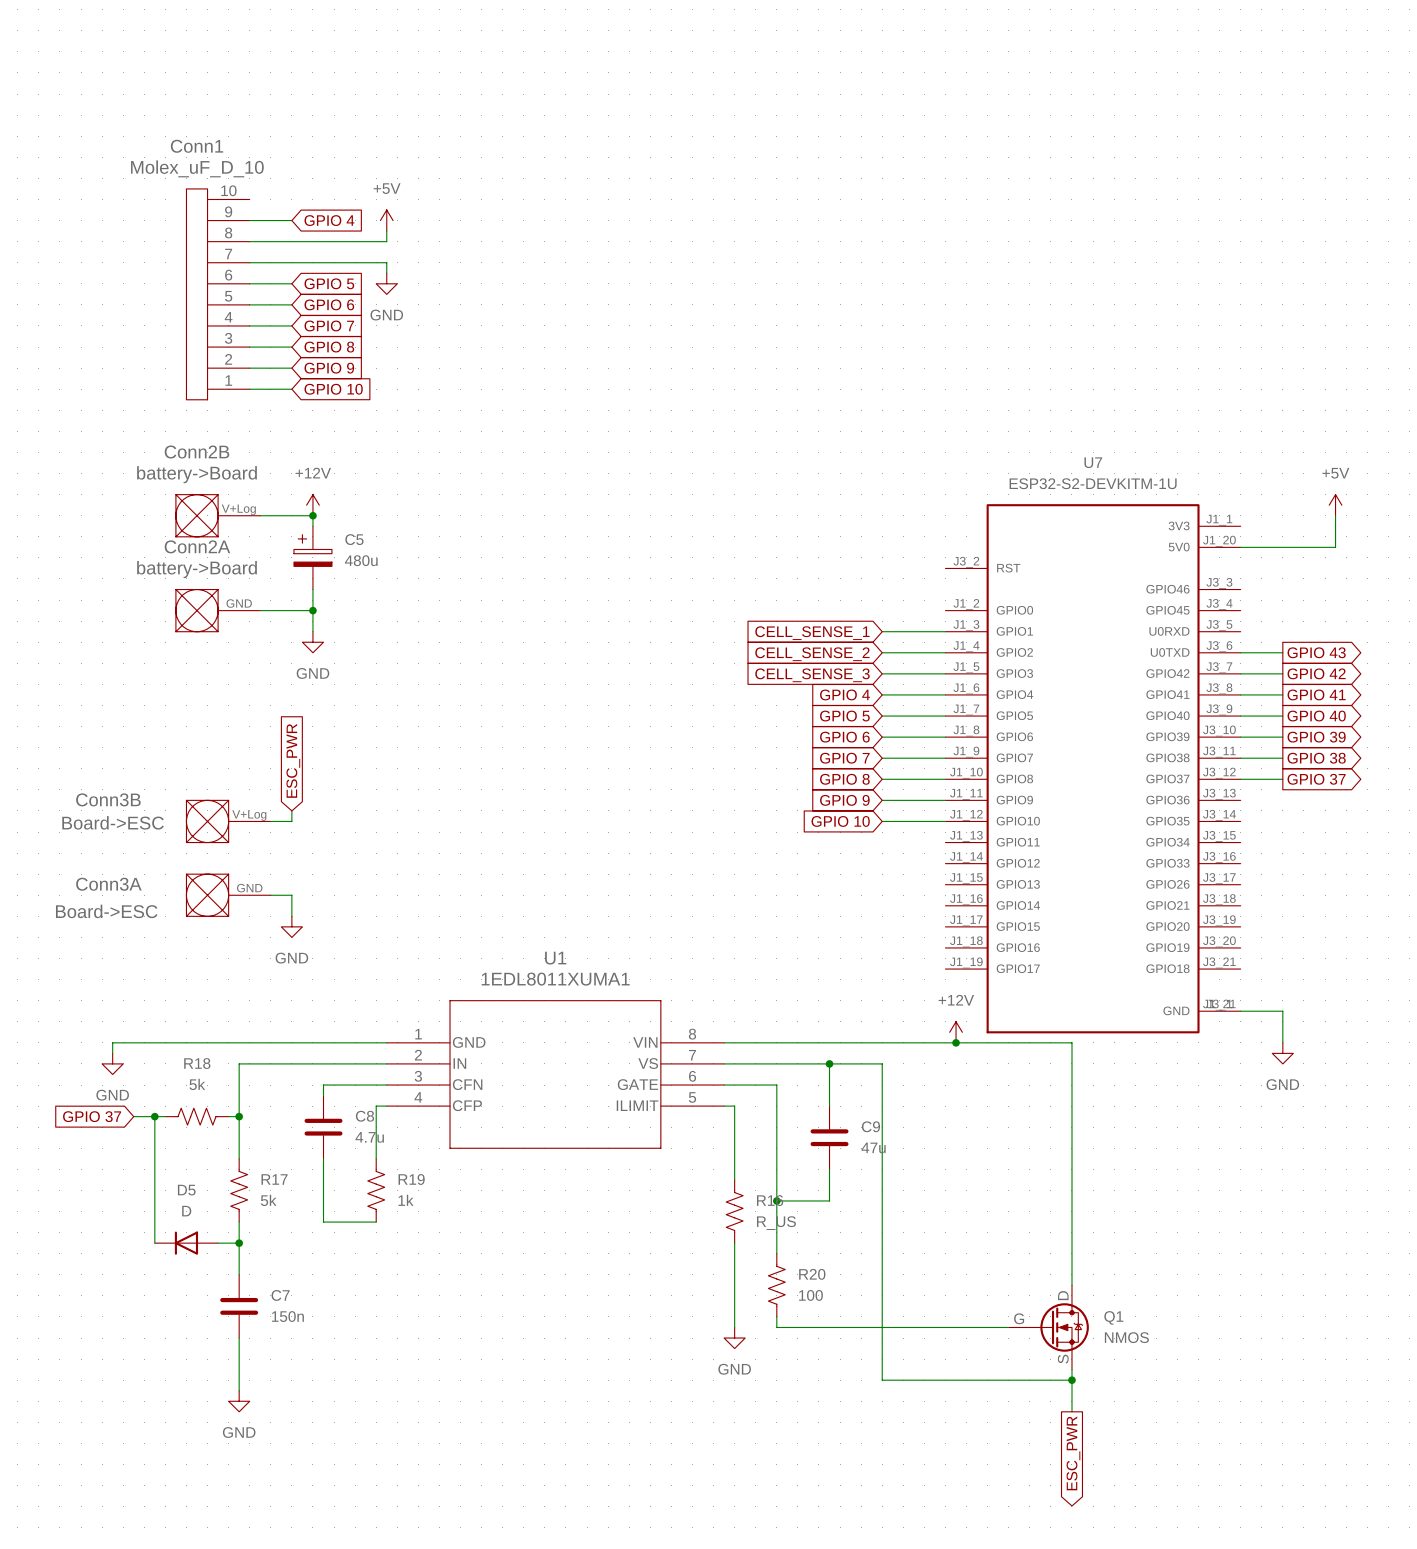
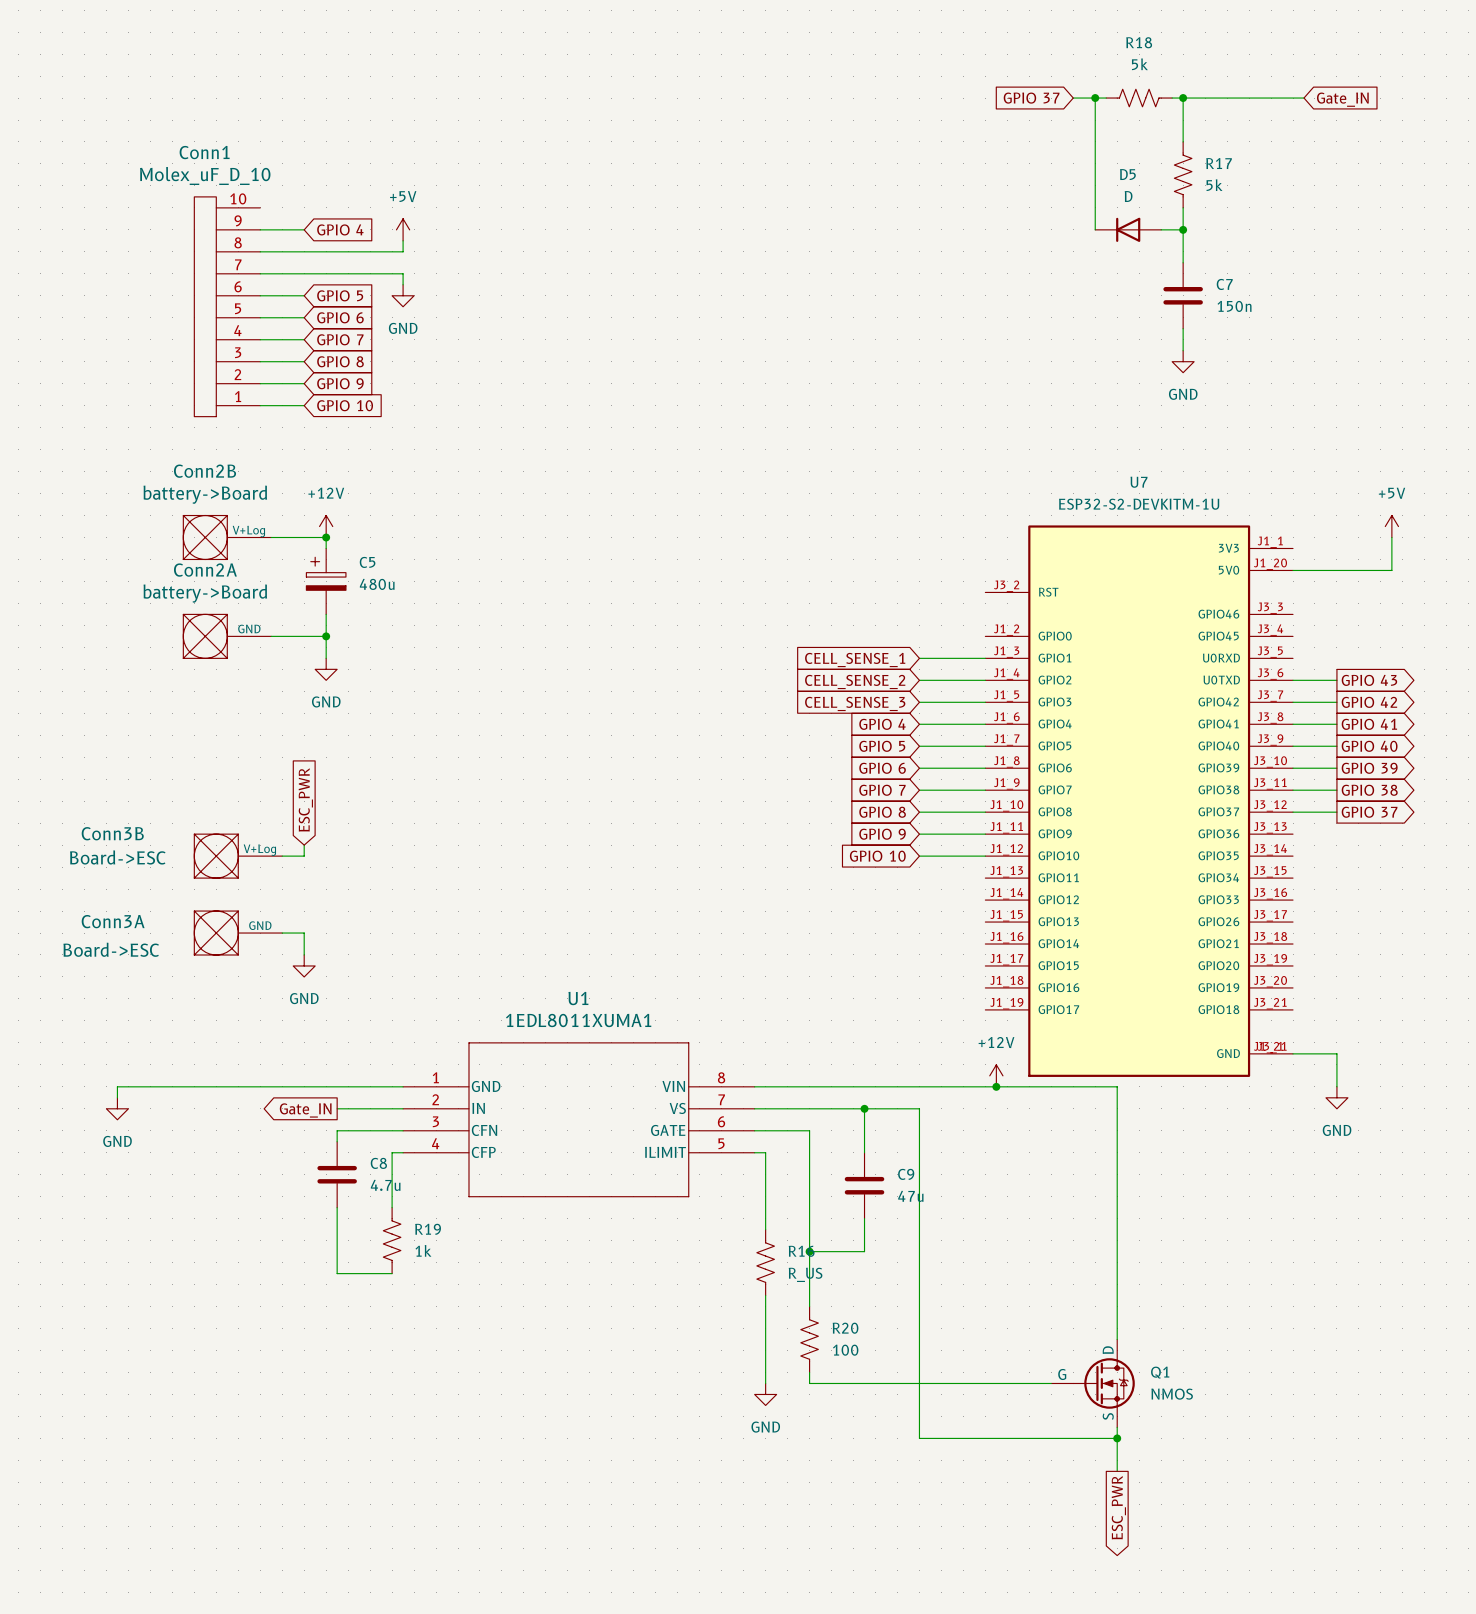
global label: none -> GPIO 37 (1031, 98)
wire: none -> (1073, 98) (1106, 98)
wire: none -> (1095, 98) (1095, 229)
junction: none -> (1095, 98)
wire: none -> (1172, 98) (1303, 98)
wire: none -> (1183, 98) (1183, 141)
junction: none -> (1183, 98)
global label: none -> Gate_IN (1342, 99)
wire: none -> (1183, 207) (1183, 262)
wire: none -> (1161, 229) (1183, 229)
junction: none -> (1183, 229)
wire: none -> (1183, 328) (1183, 350)
power symbol: none -> GND (1183, 361)
wire: (323, 1063) (239, 1063) (239, 1158) -> none
global label: none -> Gate_IN (305, 1110)
global label: GPIO 37 (92, 1116) -> none
wire: (133, 1116) (165, 1116) -> none
wire: (154, 1116) (154, 1243) -> none
junction: (154, 1116) -> none
R18 position: (197, 1116) -> (1139, 98)
wire: (228, 1116) (239, 1116) -> none
junction: (239, 1116) -> none
R17 position: (239, 1190) -> (1183, 174)
wire: (239, 1222) (239, 1274) -> none
D5 position: (186, 1243) -> (1128, 229)
wire: (218, 1243) (239, 1243) -> none
junction: (239, 1243) -> none
C7 position: (239, 1306) -> (1183, 295)
wire: (239, 1338) (239, 1390) -> none
power symbol: GND (239, 1401) -> none

